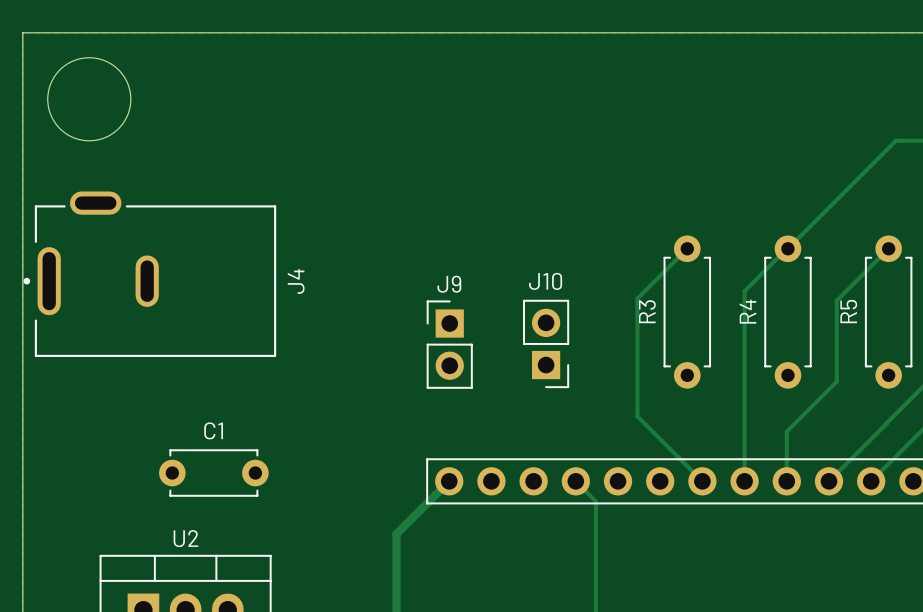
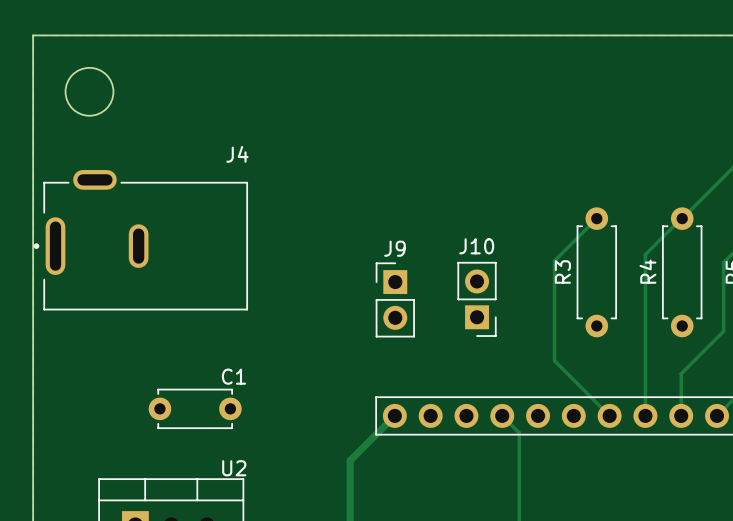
round board edge size: [47, 57, 132, 142] -> [65, 67, 114, 117]
J4 name rotation: 0° (296, 281) -> 90° clockwise (237, 154)
J4 name position: J4 (296, 281) -> J4 (237, 154)
C1 name position: C1 (213, 430) -> C1 (233, 376)
U2 name position: U2 (185, 538) -> U2 (234, 468)

